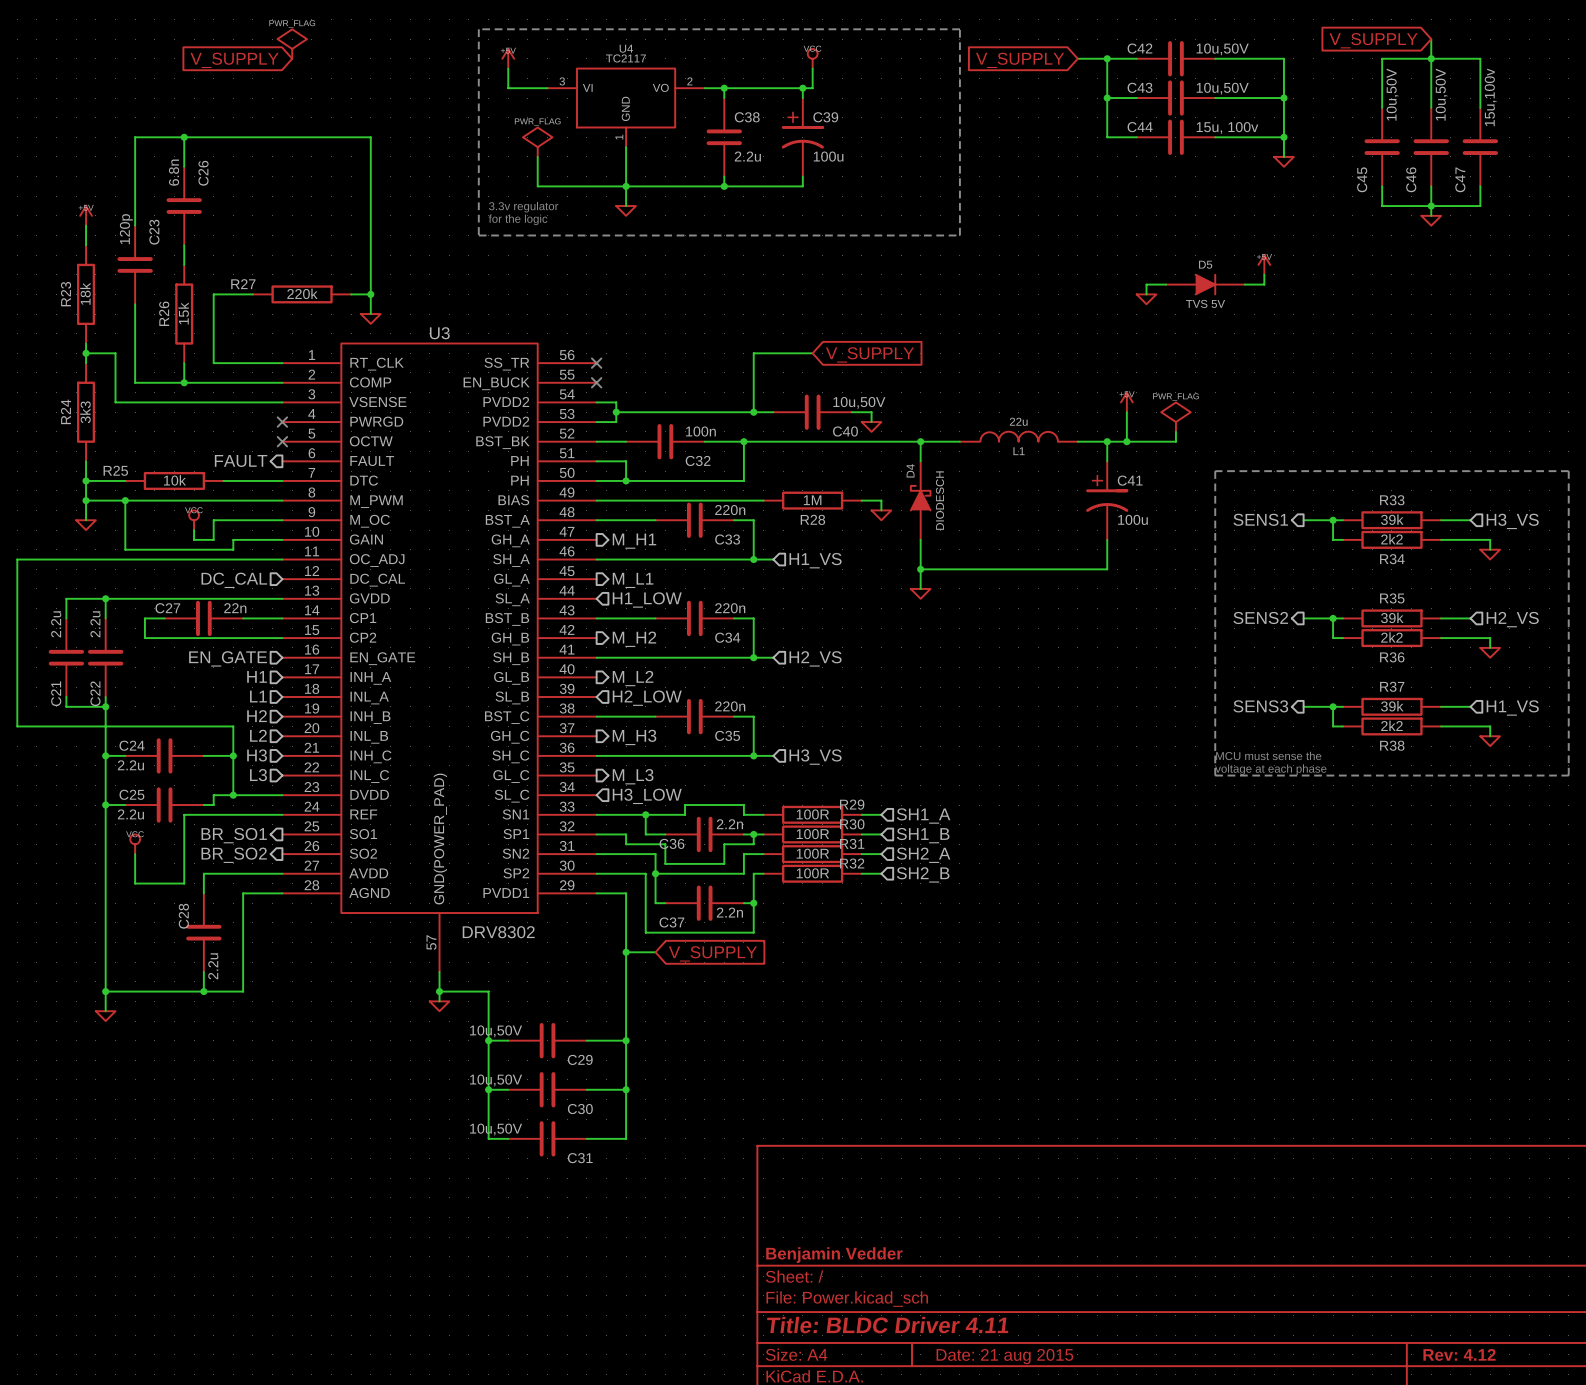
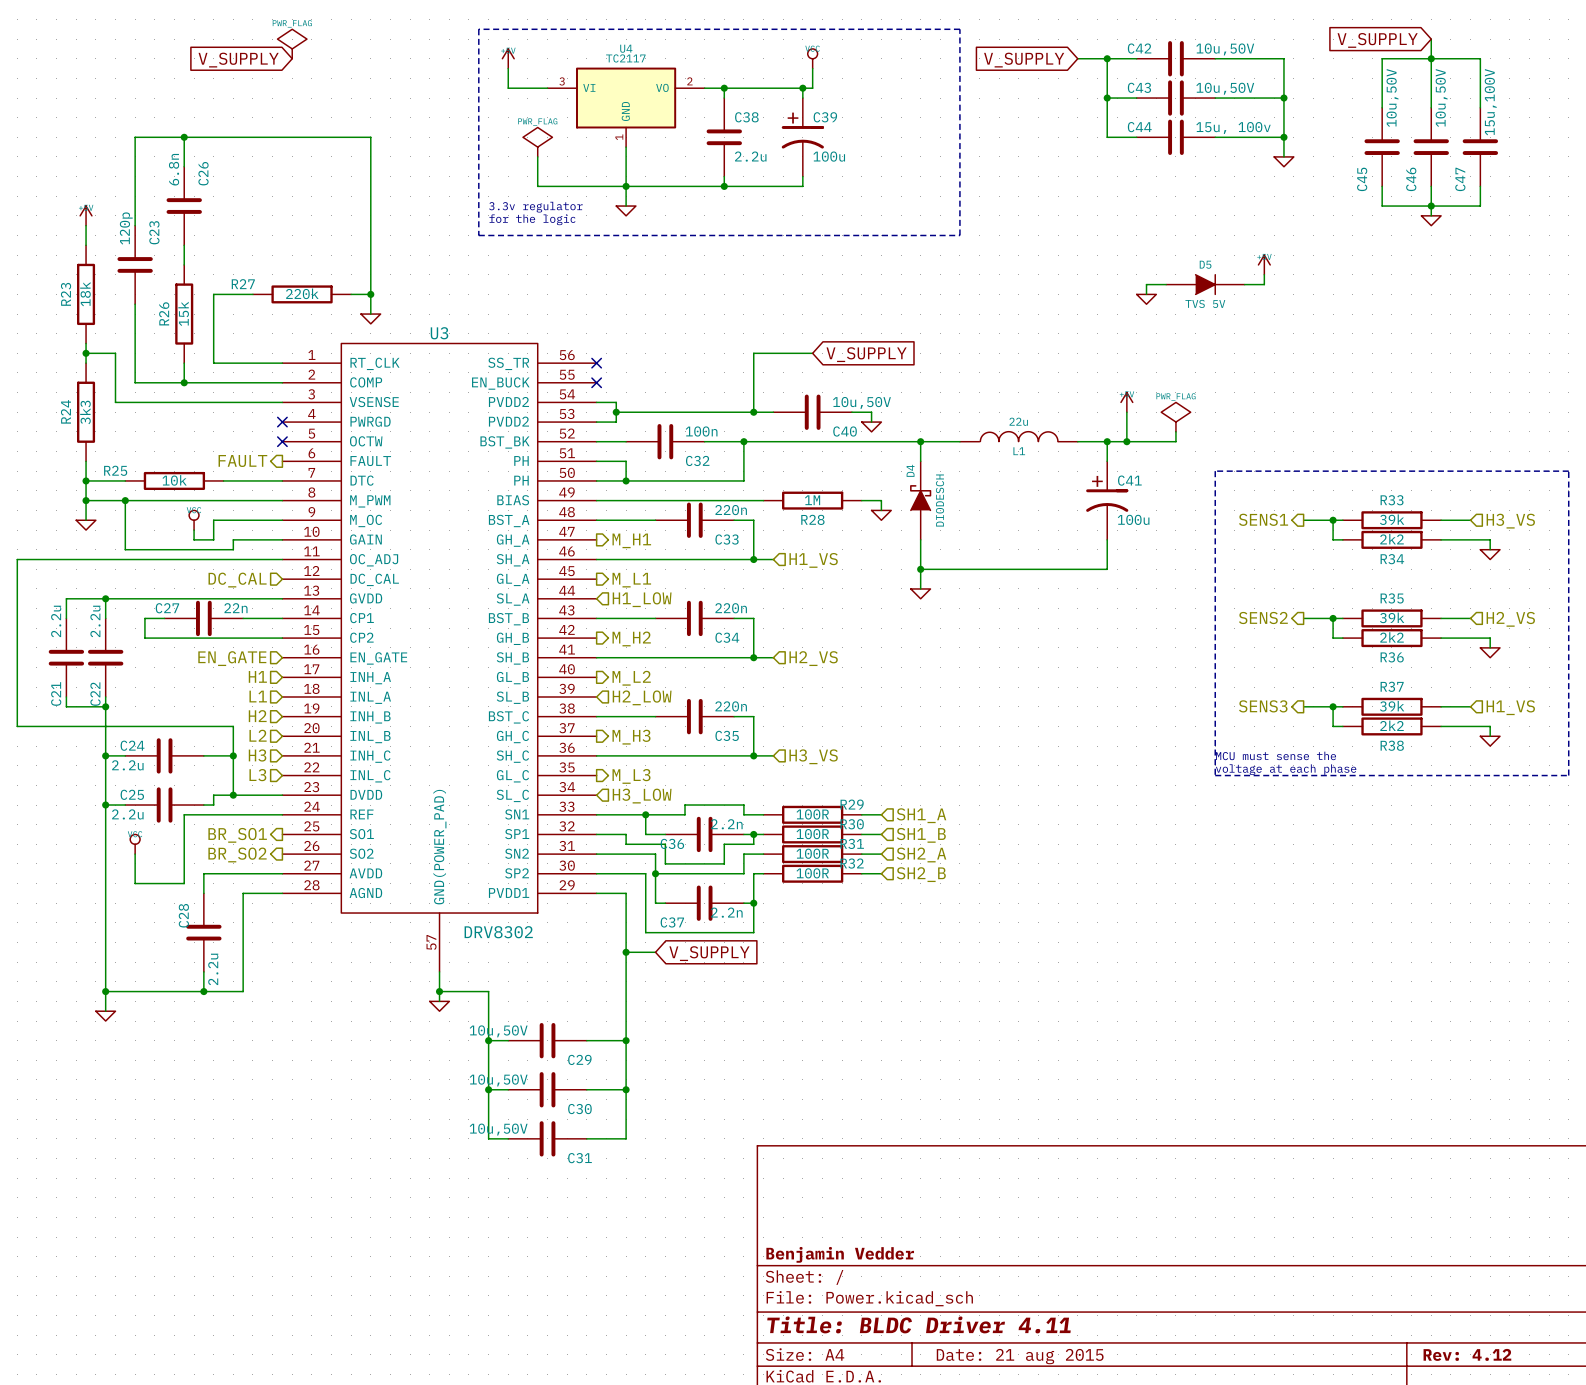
C47 value: 15u,100v (1490, 97) -> 15u,100V (1490, 102)

